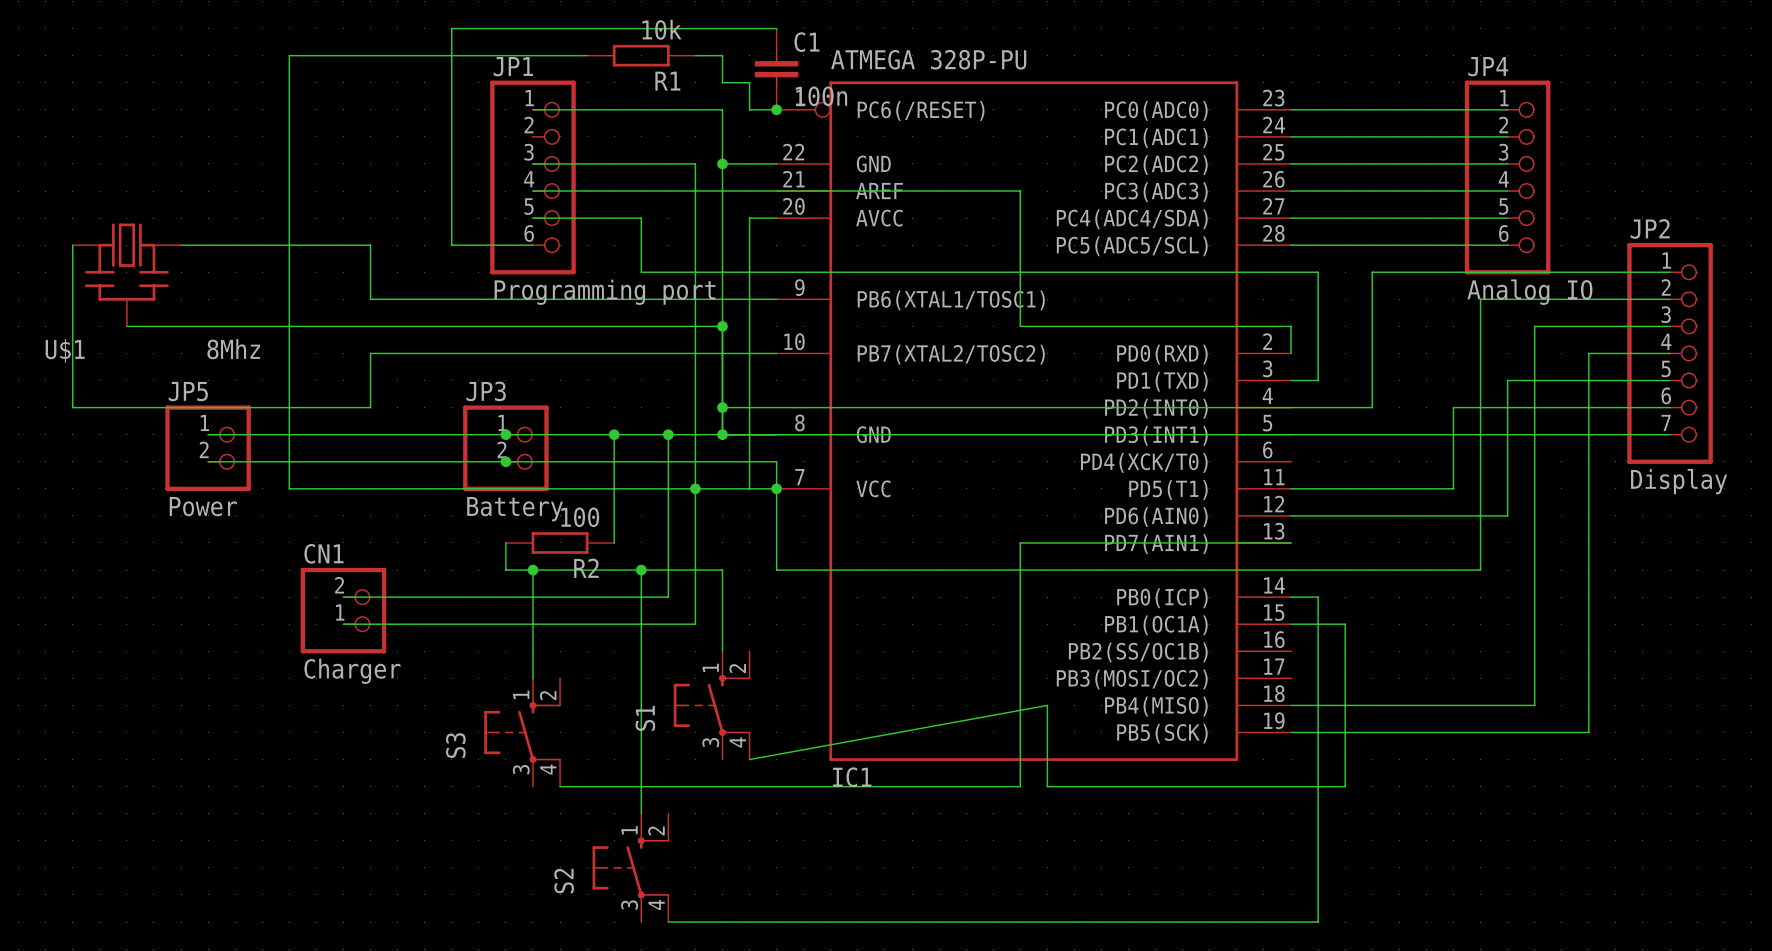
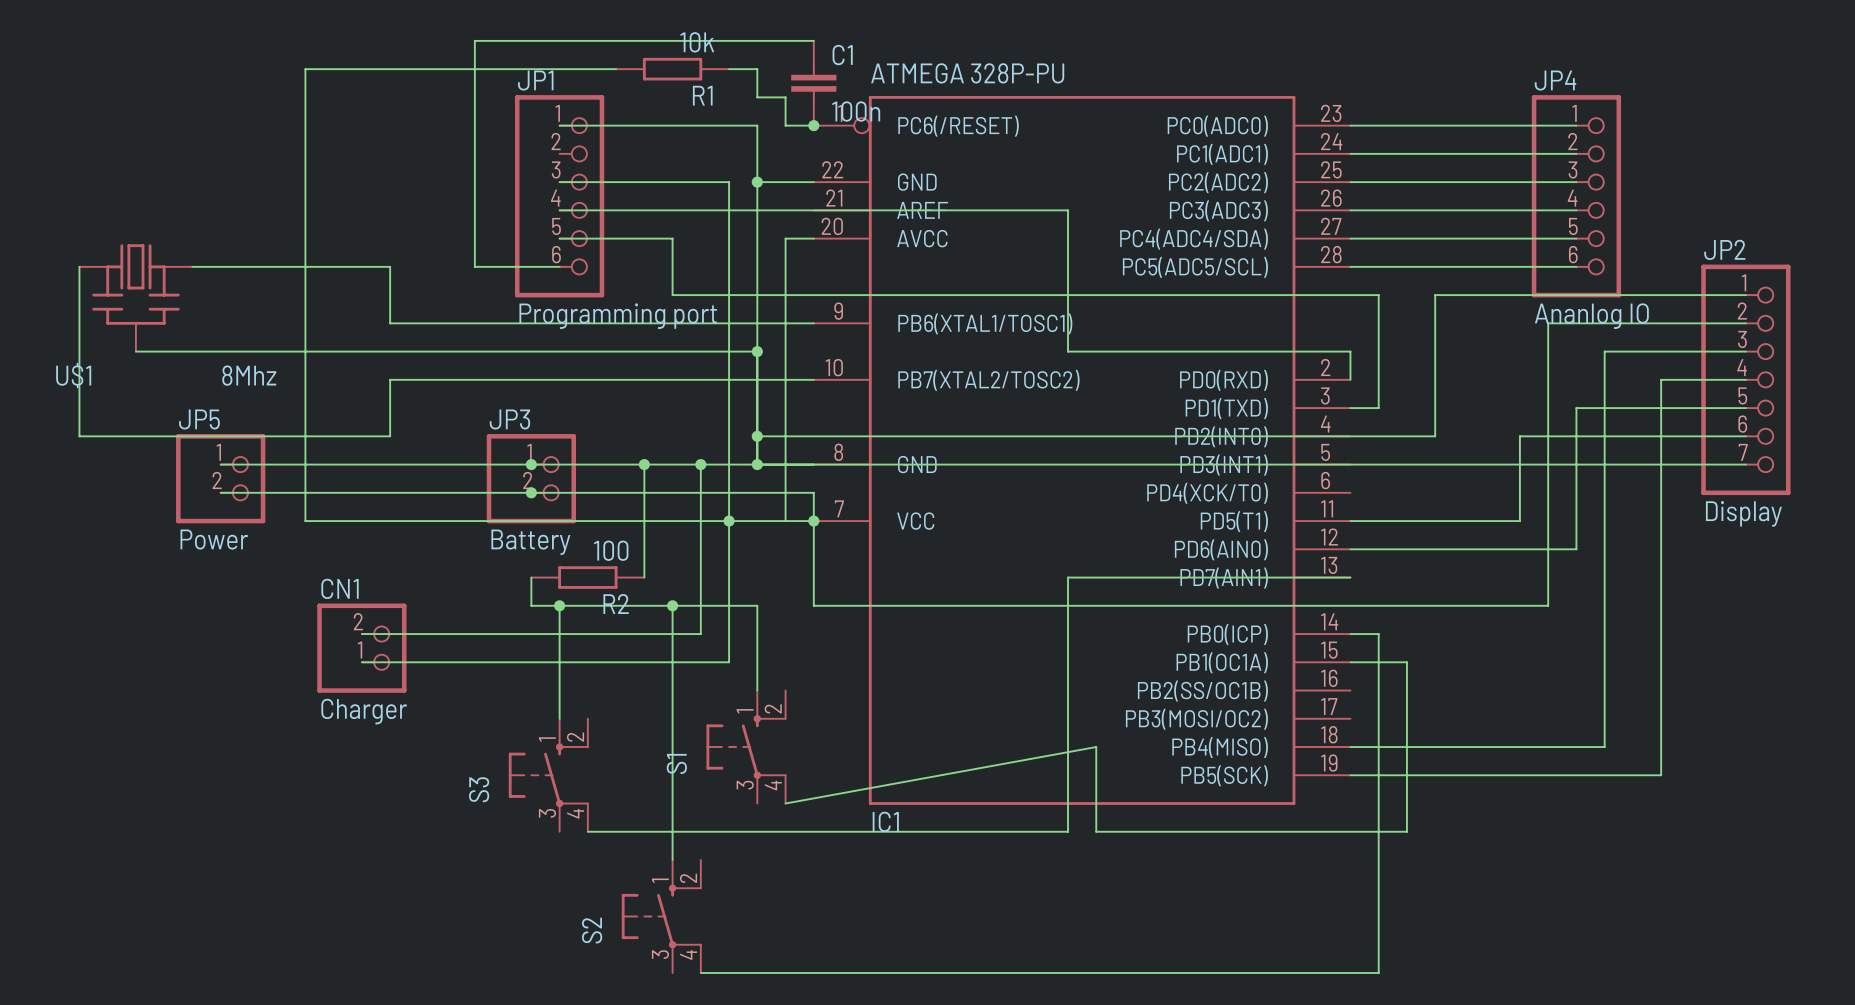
JP4 value: Analog IO (1529, 292) -> Ananlog IO (1591, 316)

